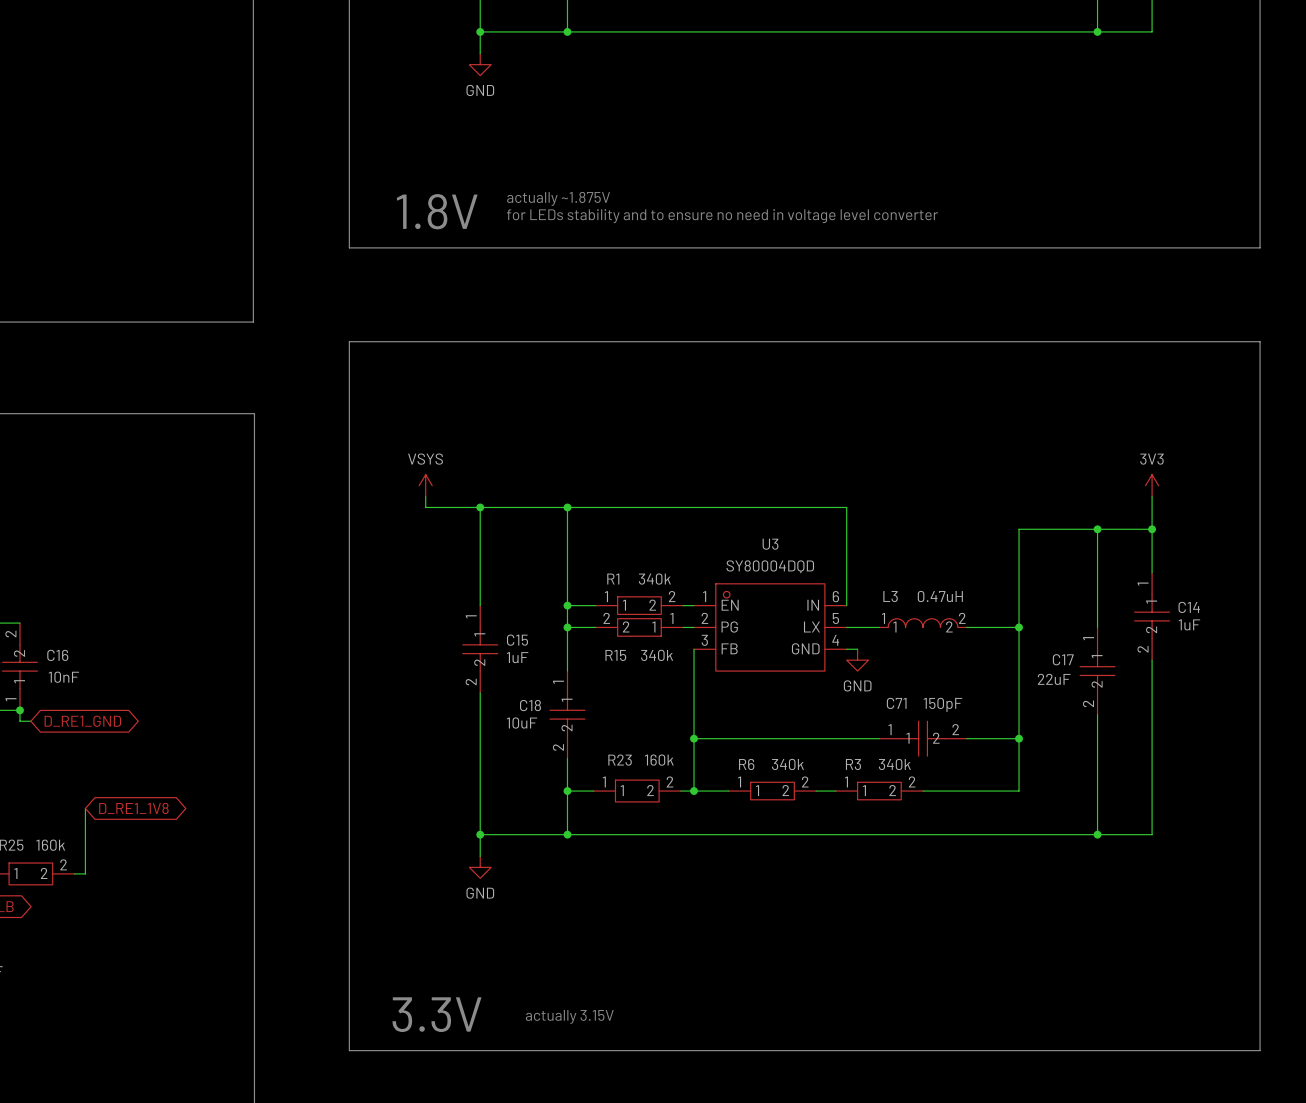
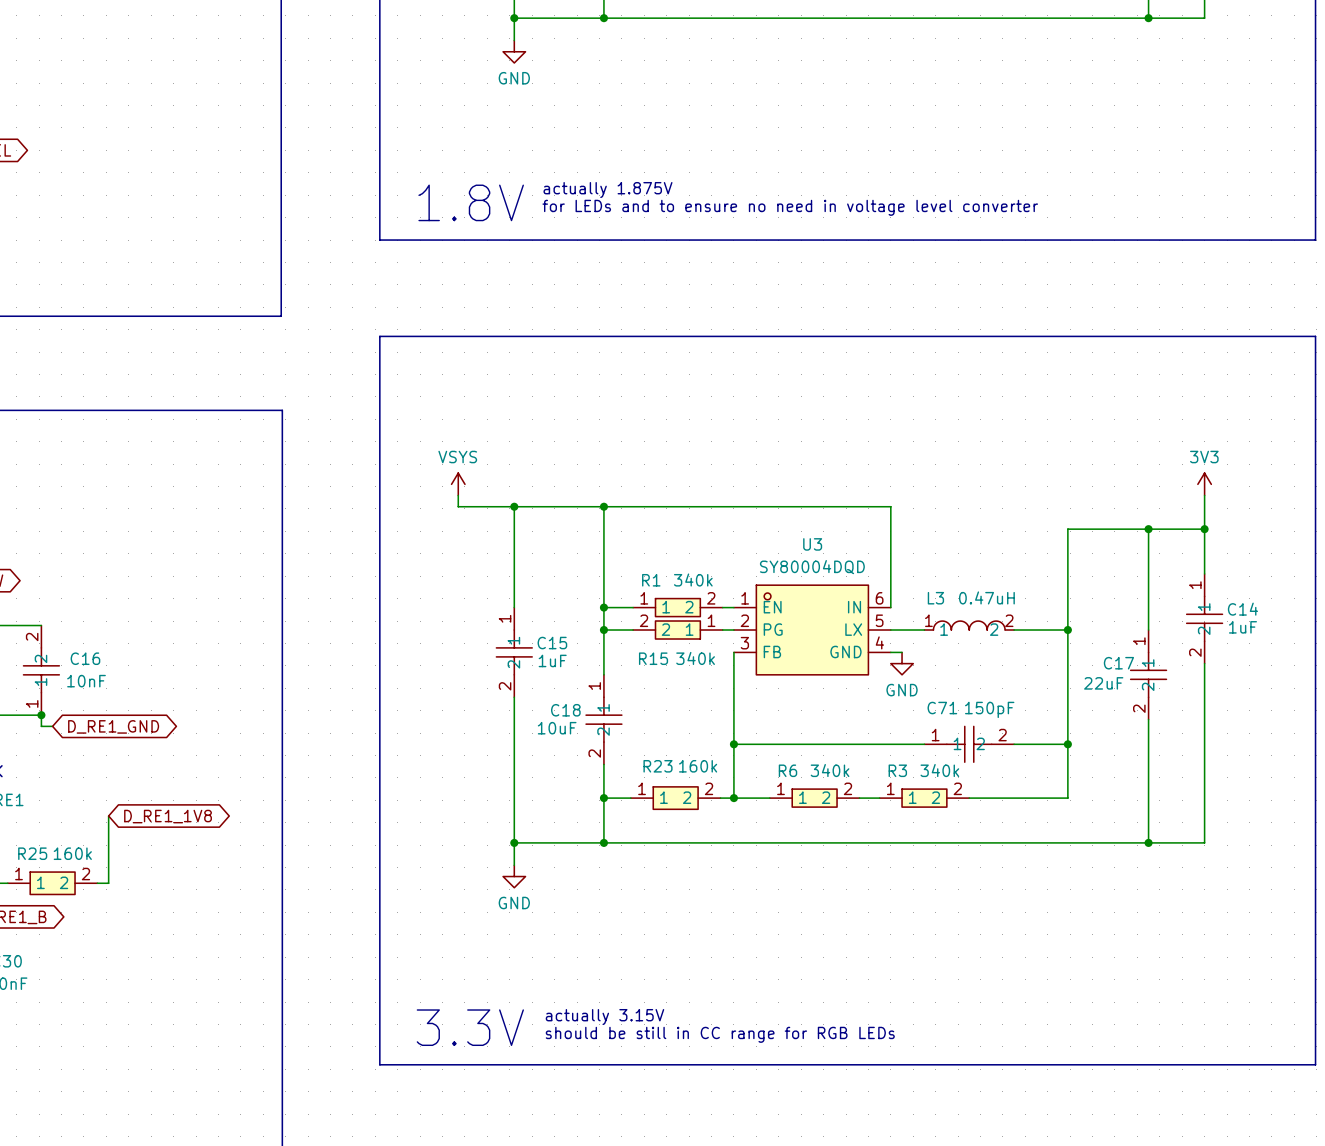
text: actually ~1.875V (558, 198) -> actually 1.875V (607, 190)
text: for LEDs stability and to ensure no need in voltage level converter (722, 216) -> for LEDs and to ensure no need in voltage level converter (790, 207)
text position: actually 3.15V (569, 1016) -> actually 3.15V (604, 1017)
text: none -> should be still in CC range for RGB LEDs (720, 1034)

